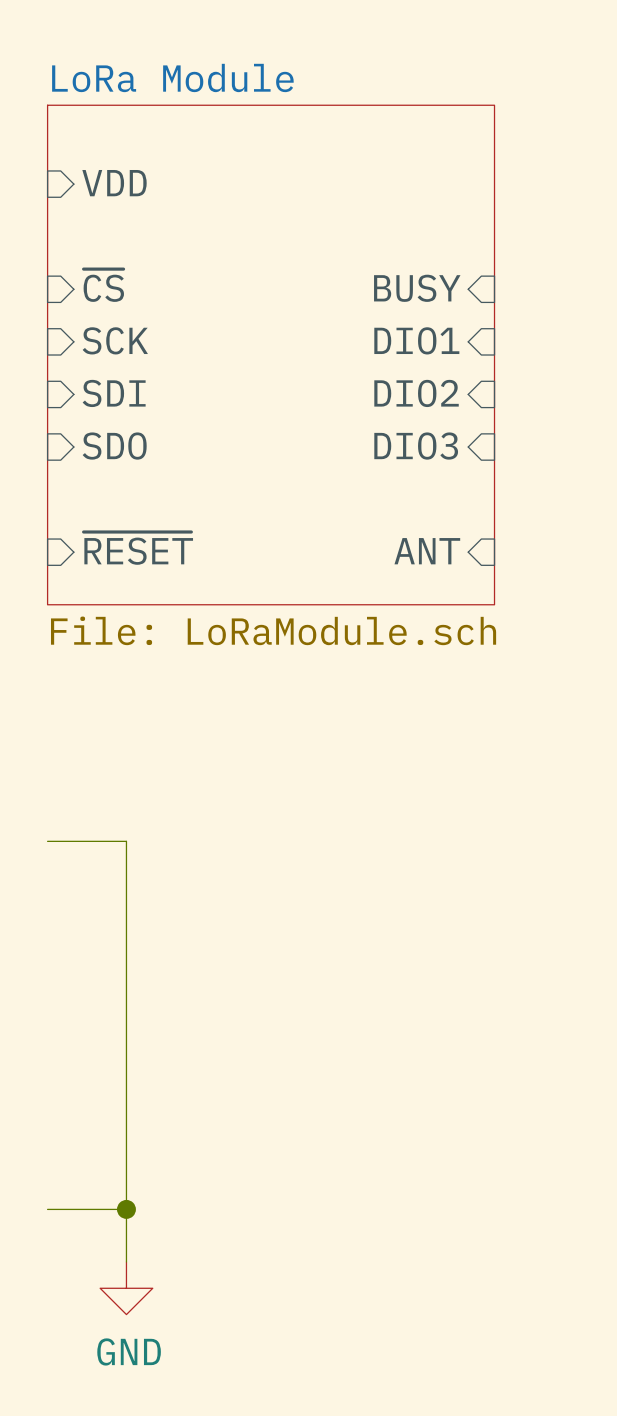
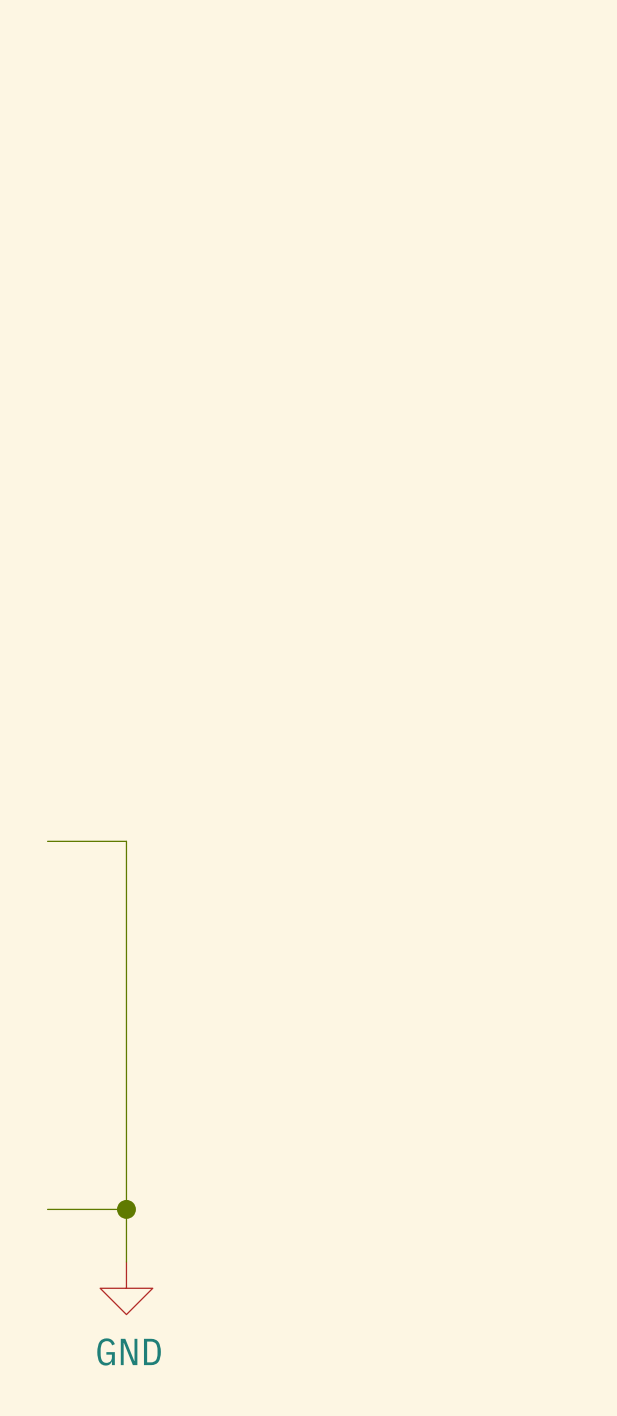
sheet pin: VDD (114, 183) -> none
sheet pin: ~{CS} (103, 285) -> none
sheet pin: BUSY (417, 288) -> none
sheet pin: SCK (115, 340) -> none
sheet pin: DIO1 (416, 340) -> none
sheet LoRa Module: File: LoRaModule.sch (271, 355) -> none
sheet pin: SDI (114, 393) -> none
sheet pin: DIO2 (416, 393) -> none
sheet pin: SDO (114, 446) -> none
sheet pin: DIO3 (416, 446) -> none
sheet pin: ~{RESET} (138, 548) -> none
sheet pin: ANT (427, 551) -> none

